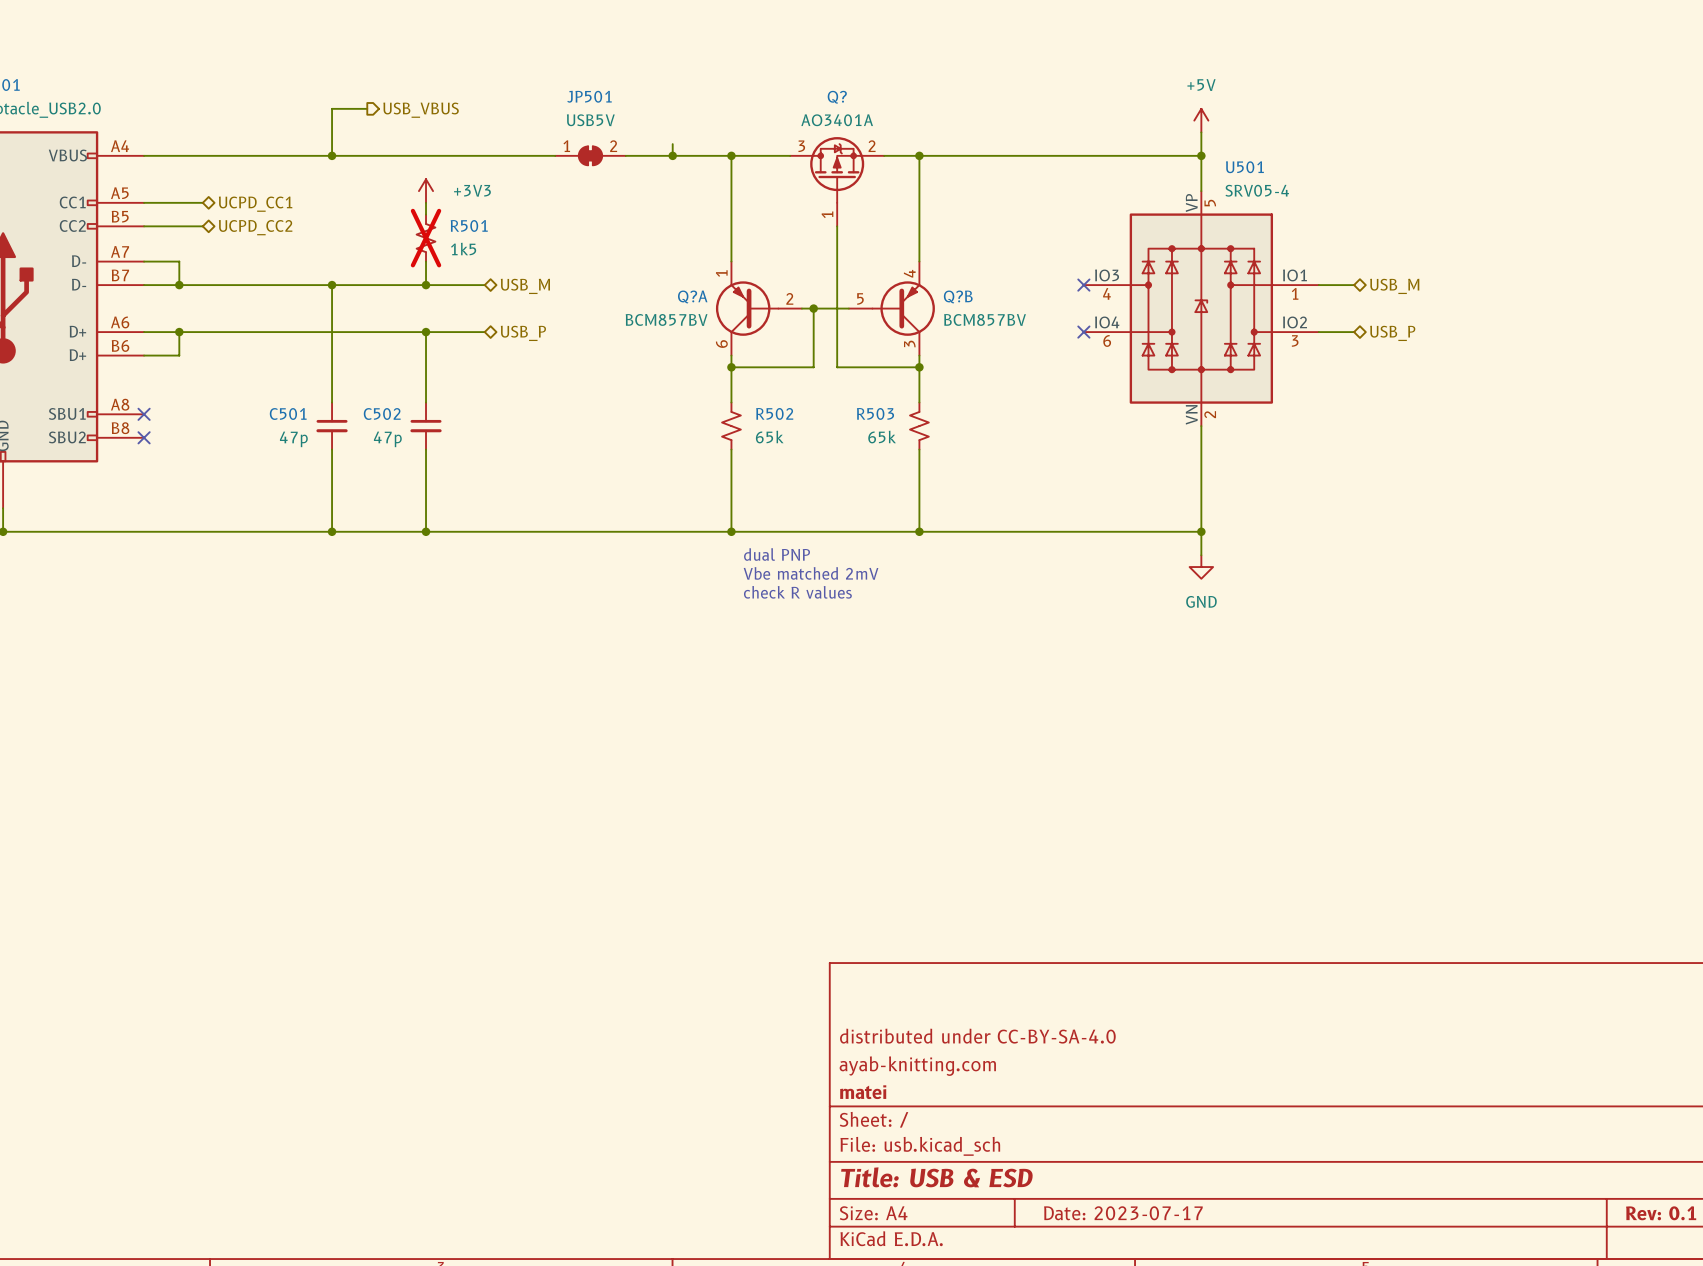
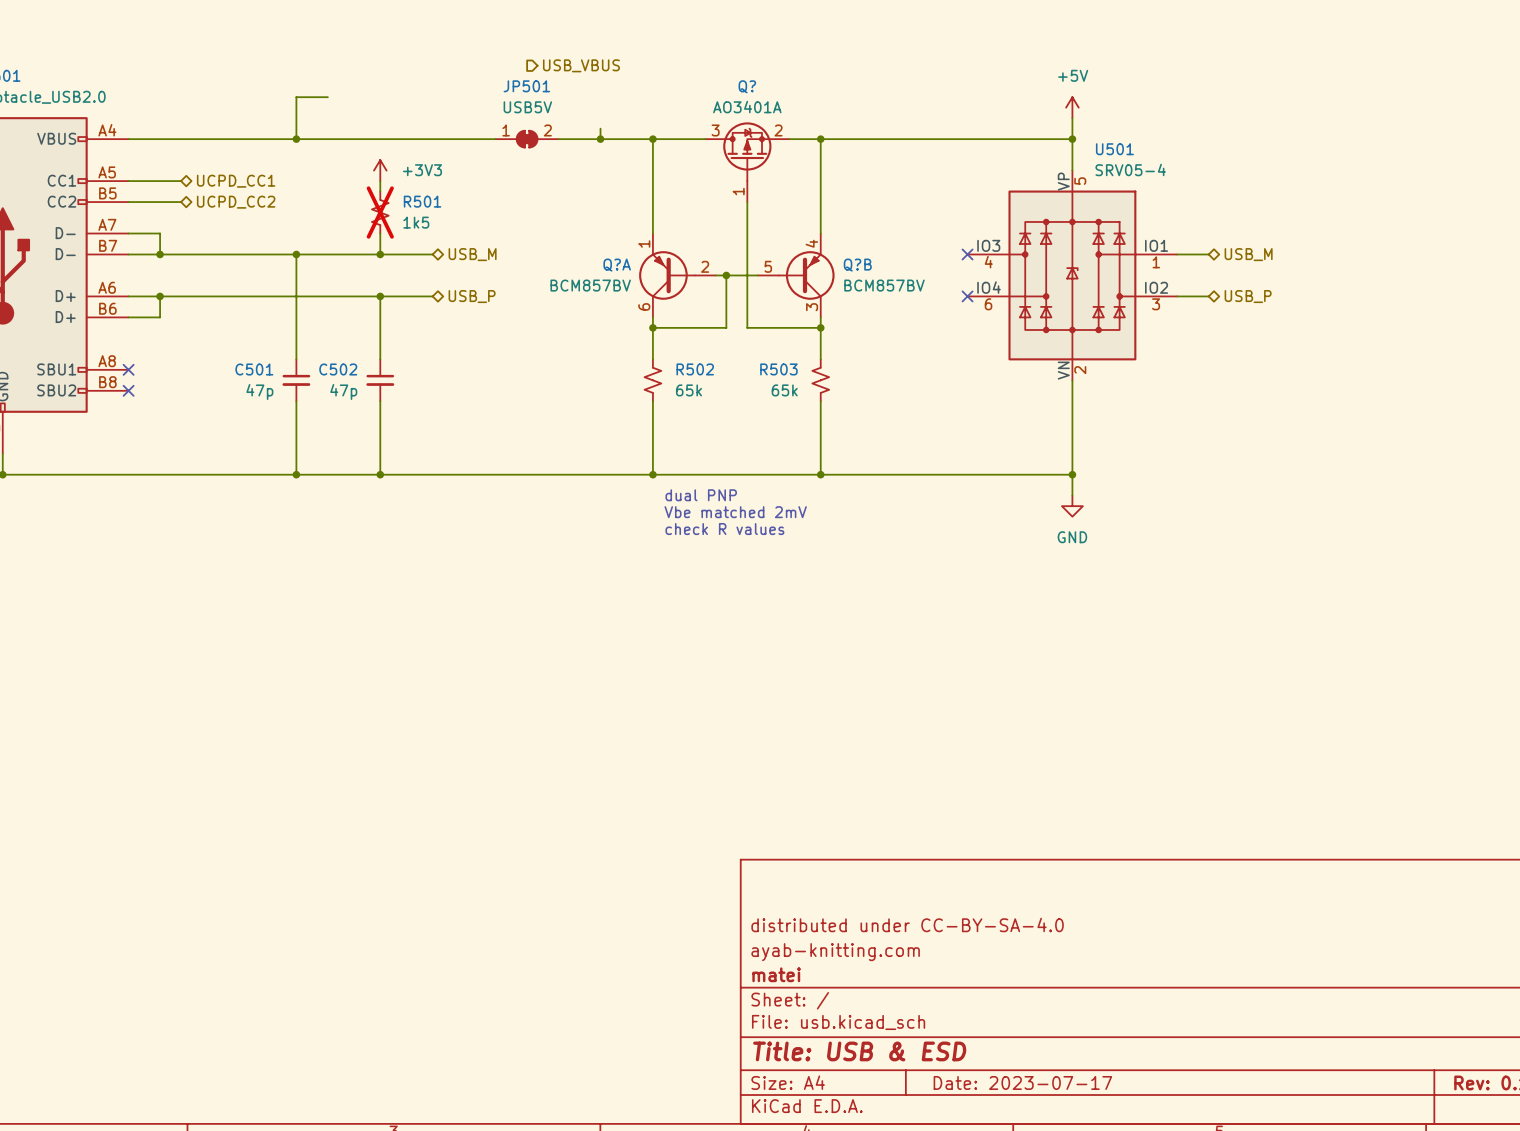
hierarchical label position: USB_VBUS (421, 110) -> USB_VBUS (581, 65)

